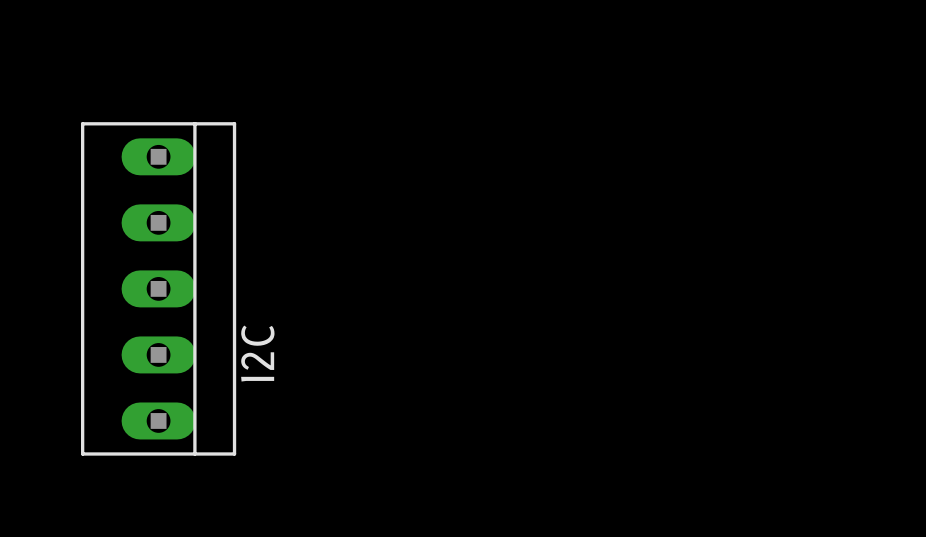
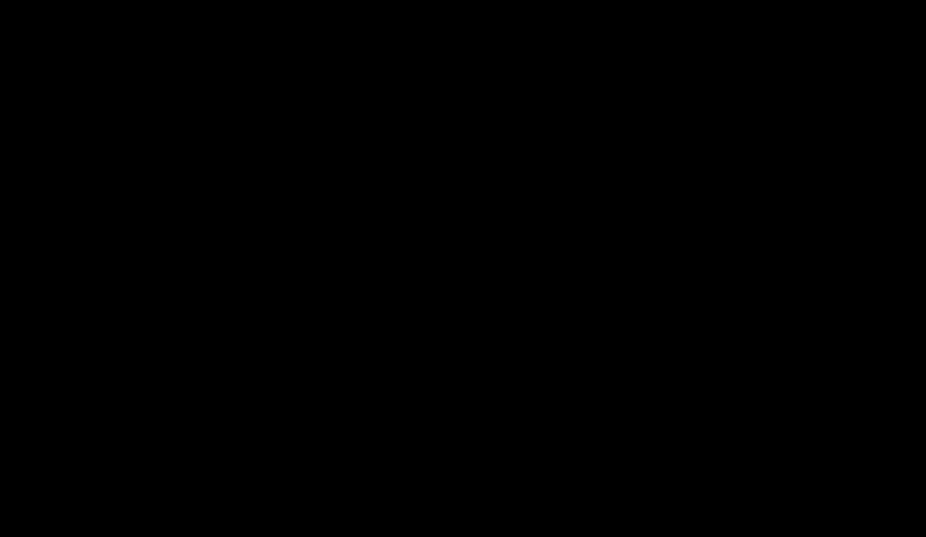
part: I2C (158, 288) -> none

